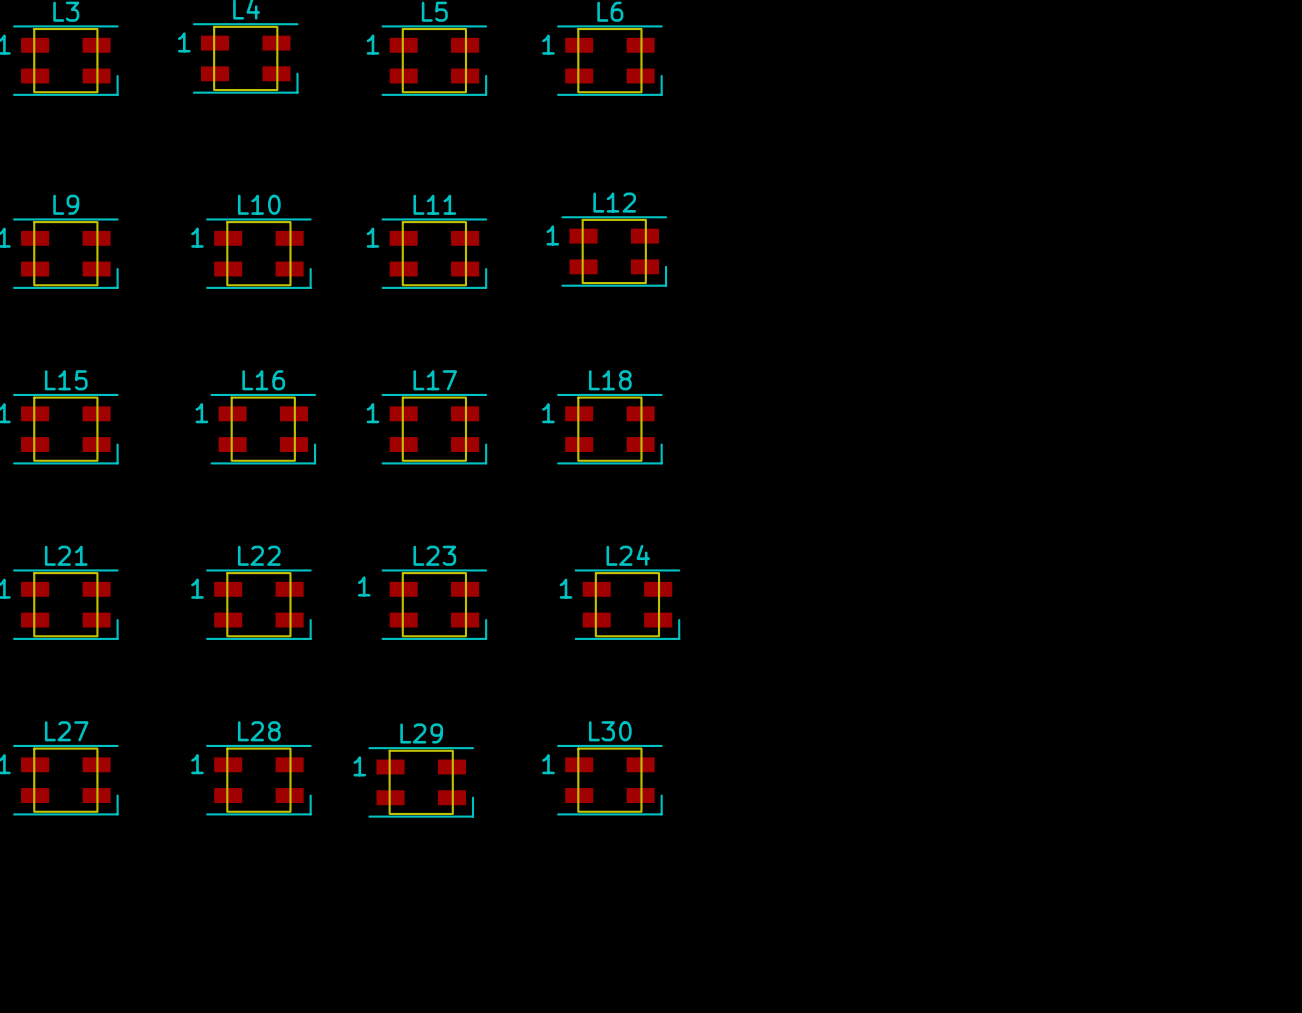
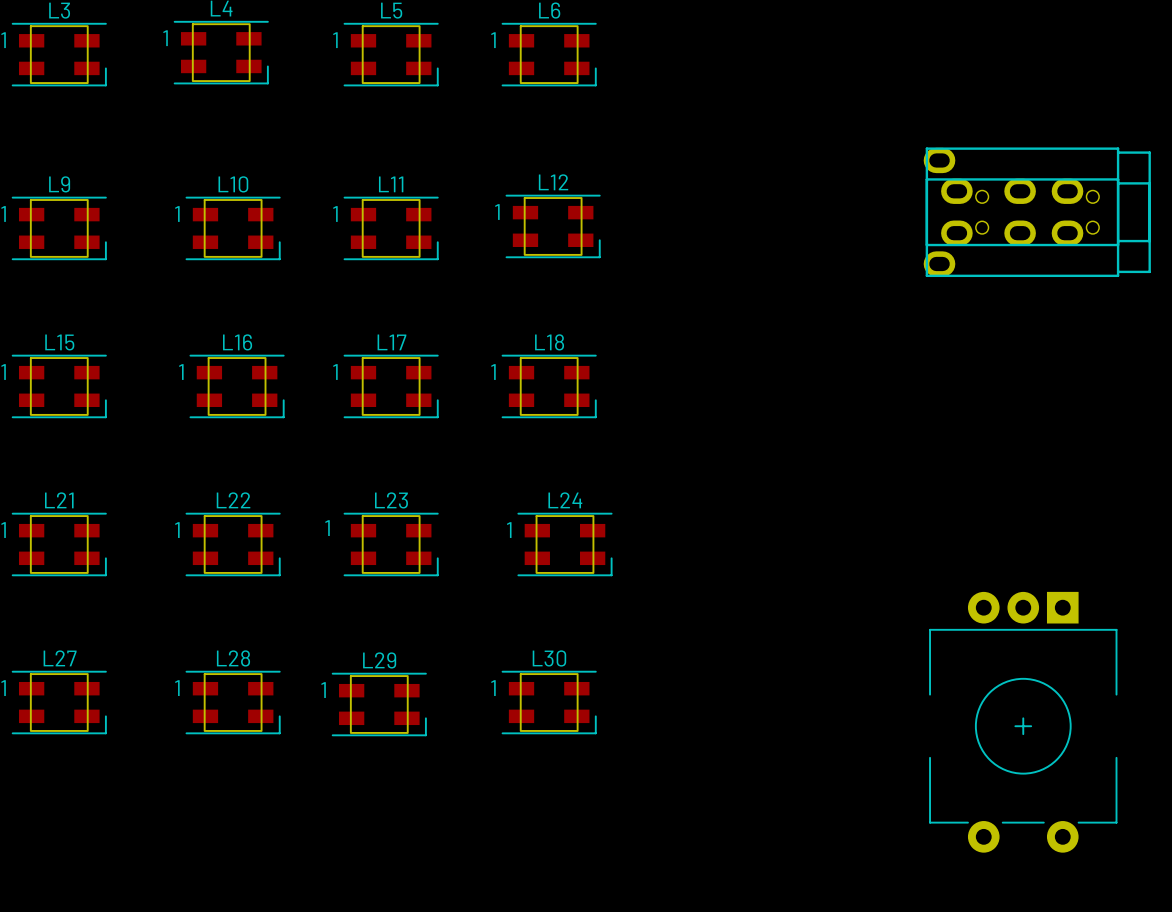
part: none -> (1037, 212)
part: none -> (1023, 722)

